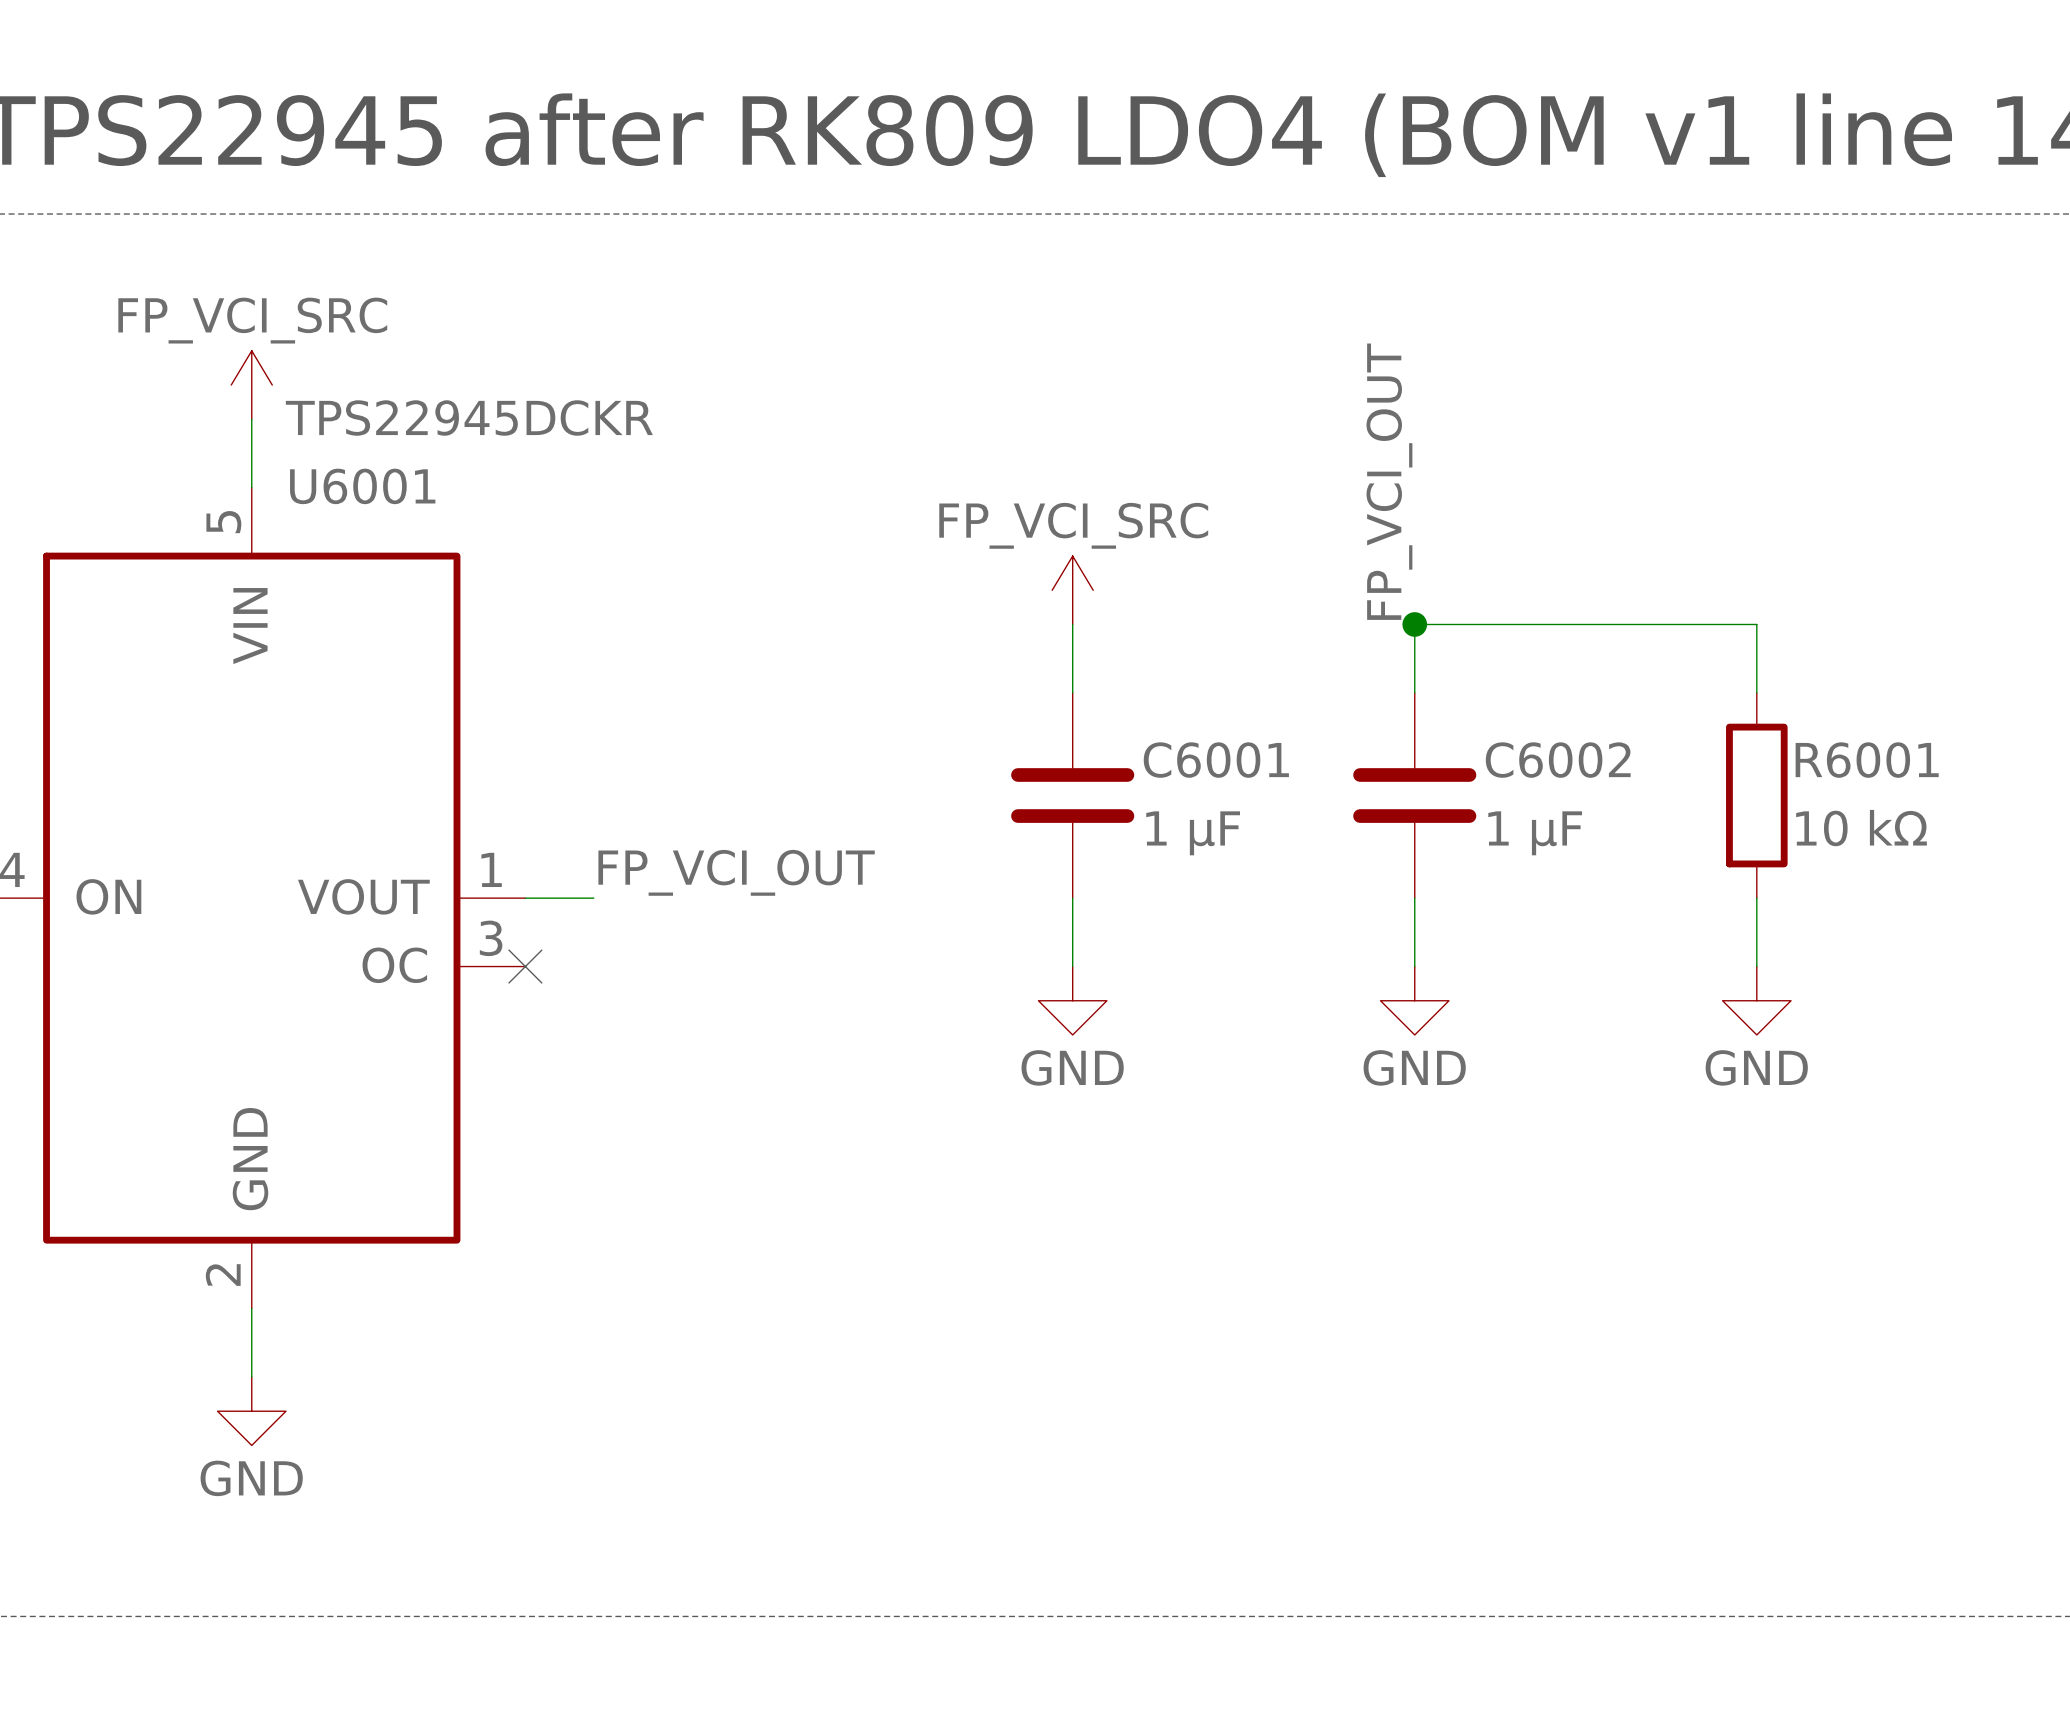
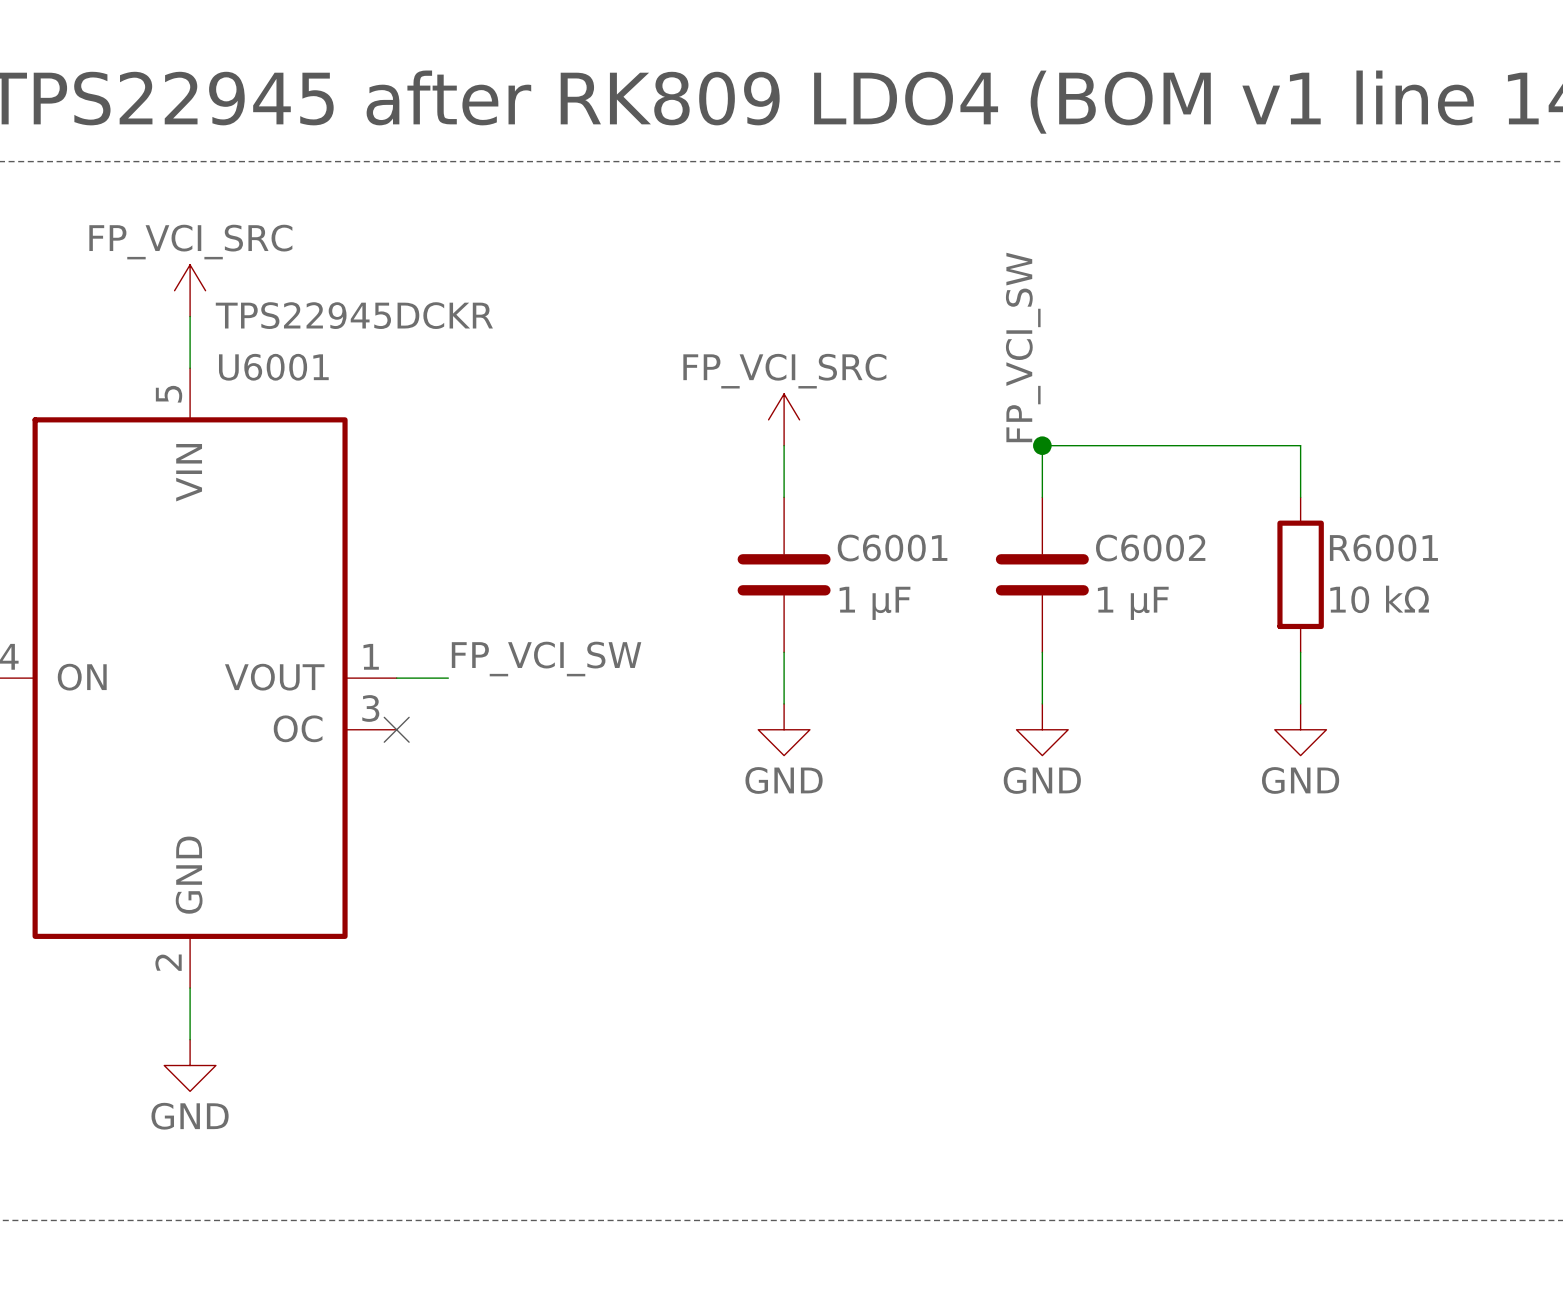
label: FP_VCI_OUT (1389, 481) -> FP_VCI_SW (1023, 347)
power symbol position: FP_VCI_SRC (1072, 590) -> FP_VCI_SRC (784, 419)
wire: (1072, 624) (1072, 692) -> (784, 445) (784, 497)
junction position: (1414, 624) -> (1042, 445)
wire: (1414, 692) (1414, 624) (1756, 624) (1756, 692) -> (1042, 497) (1042, 445) (1300, 445) (1300, 497)
C6001 position: (1072, 795) -> (784, 574)
C6002 position: (1414, 795) -> (1042, 574)
R6001 position: (1756, 795) -> (1300, 574)
label: FP_VCI_OUT (736, 872) -> FP_VCI_SW (546, 659)
wire: (1072, 898) (1072, 966) -> (784, 652) (784, 703)
wire: (1414, 898) (1414, 966) -> (1042, 652) (1042, 703)
wire: (1756, 898) (1756, 966) -> (1300, 652) (1300, 703)
power symbol position: GND (1072, 1000) -> GND (784, 729)
power symbol position: GND (1414, 1000) -> GND (1042, 729)
power symbol position: GND (1756, 1000) -> GND (1300, 729)

